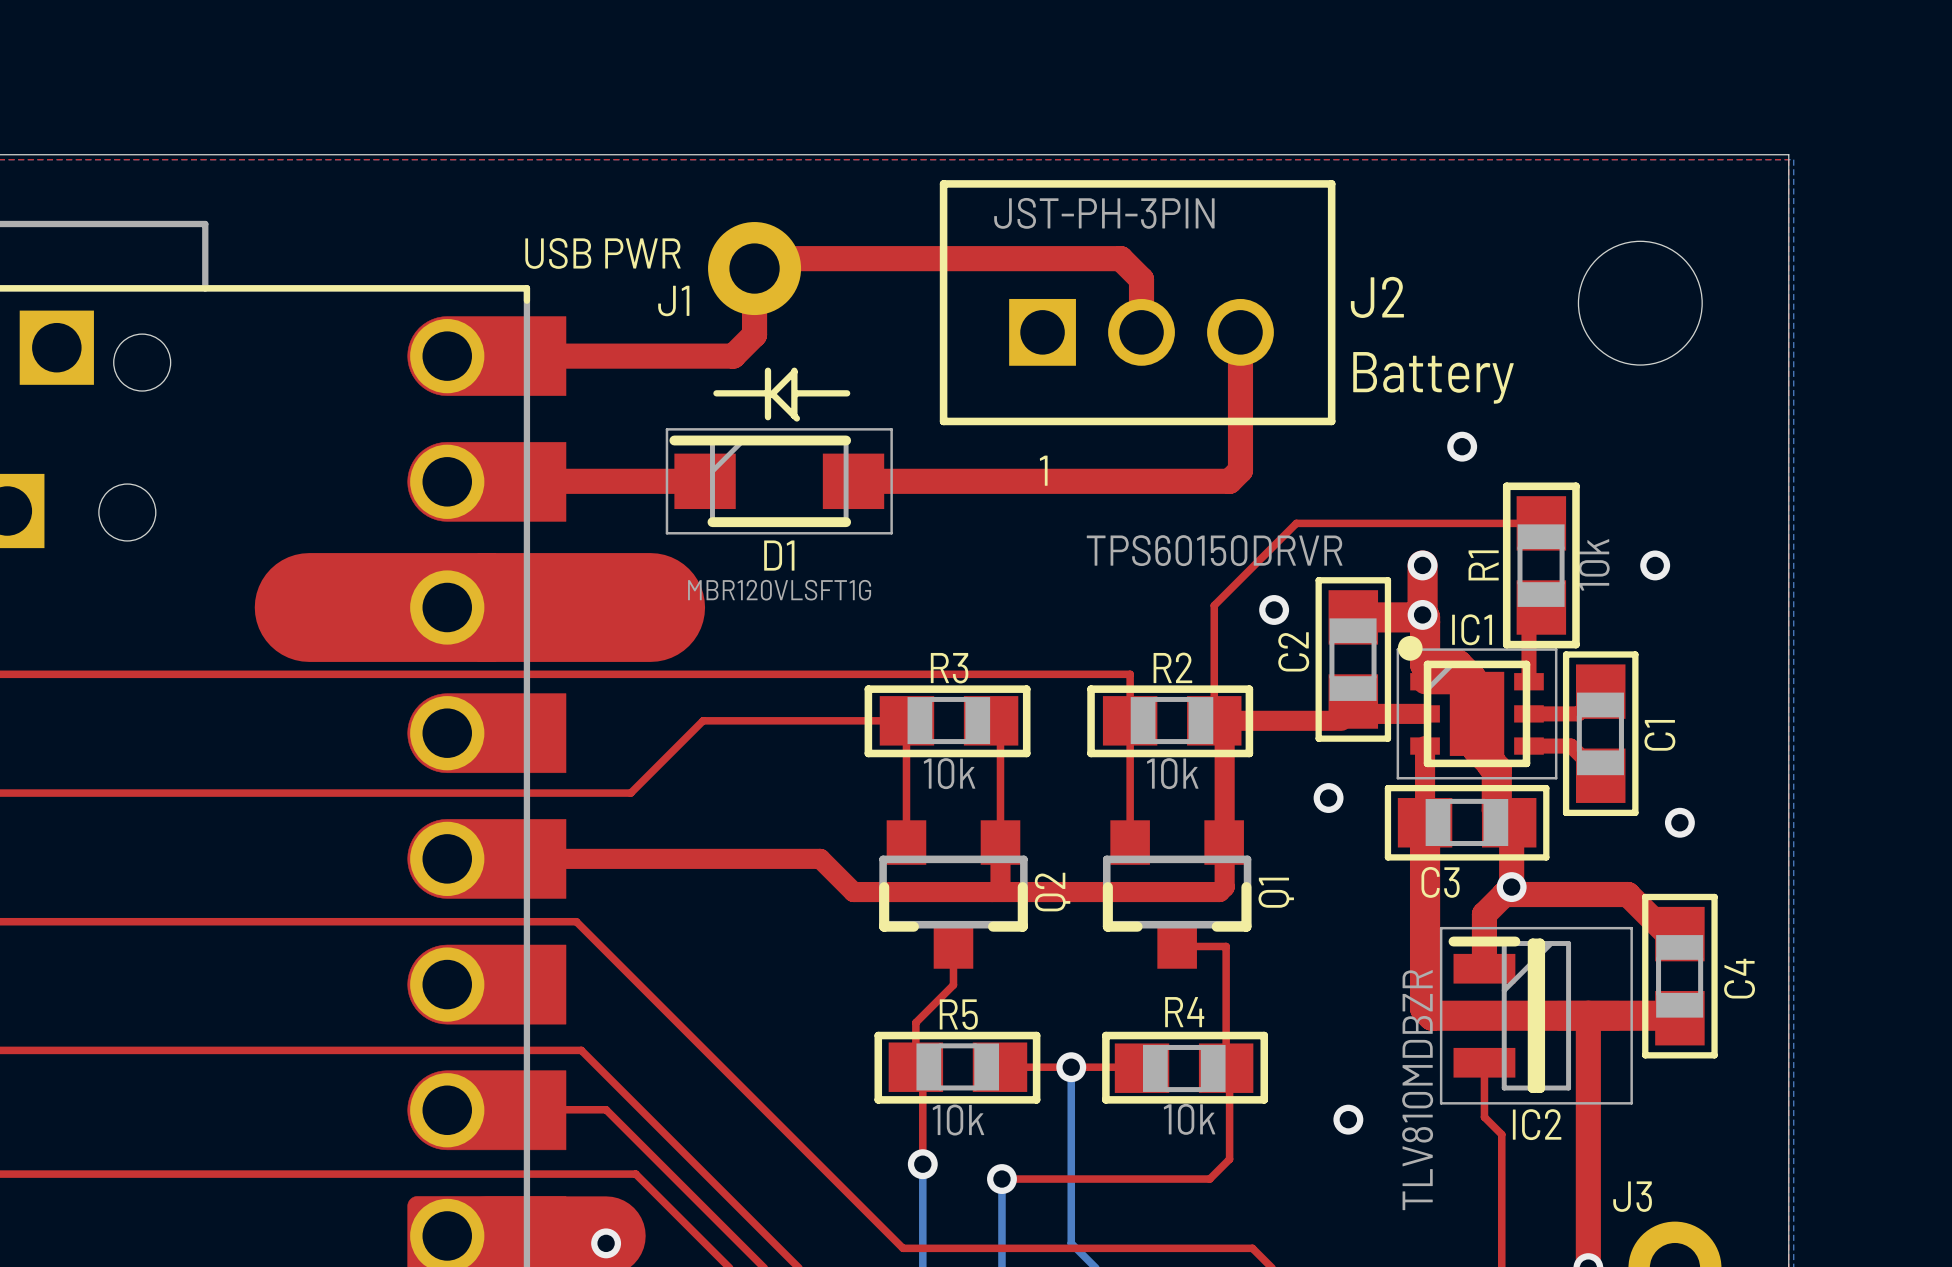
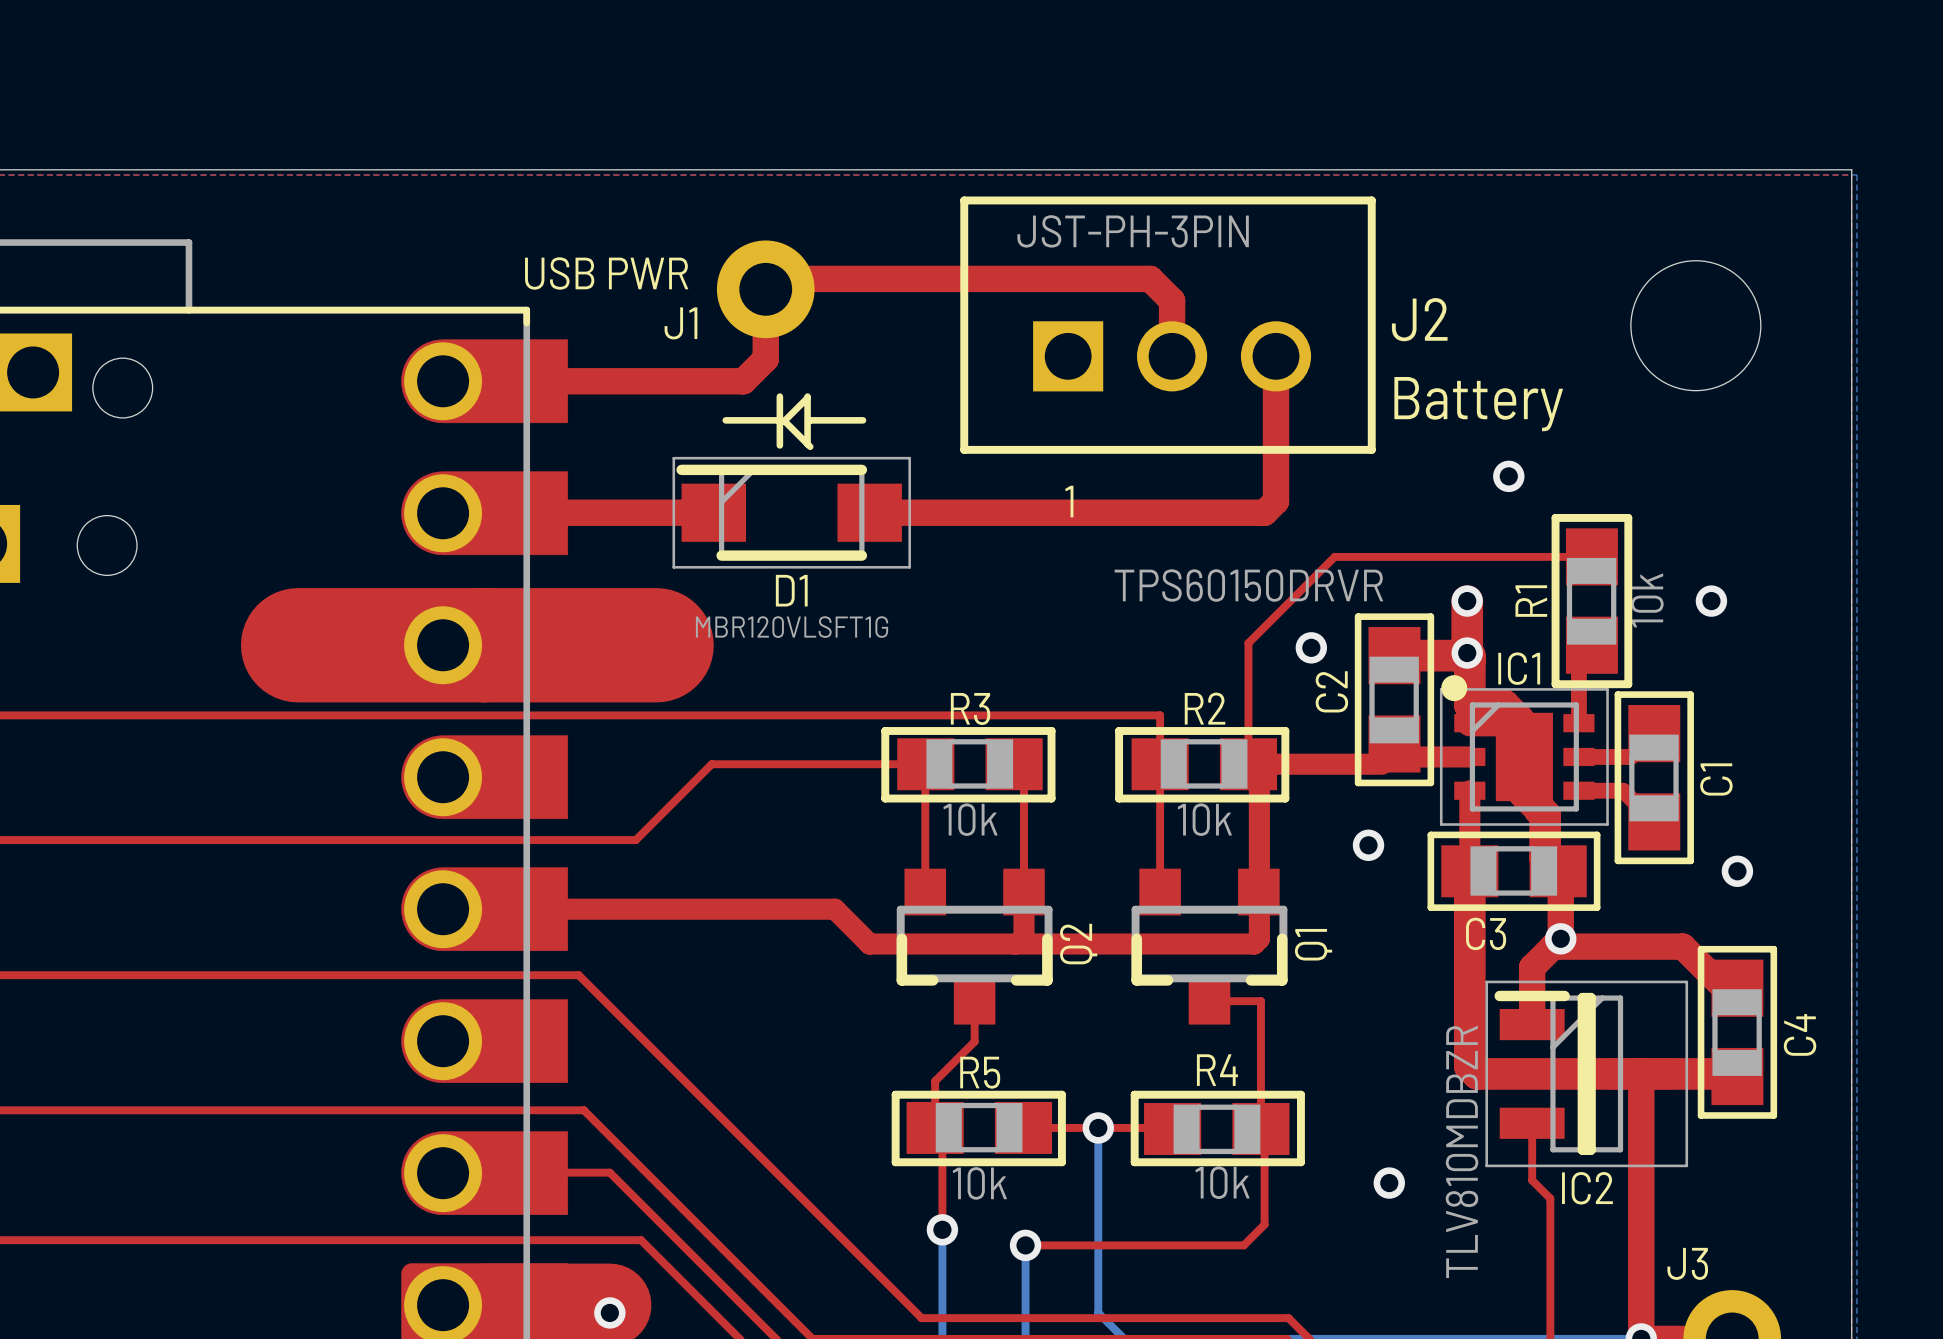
line: (1427, 664) (1526, 664) (1526, 763) (1427, 763) (1427, 664) -> none

